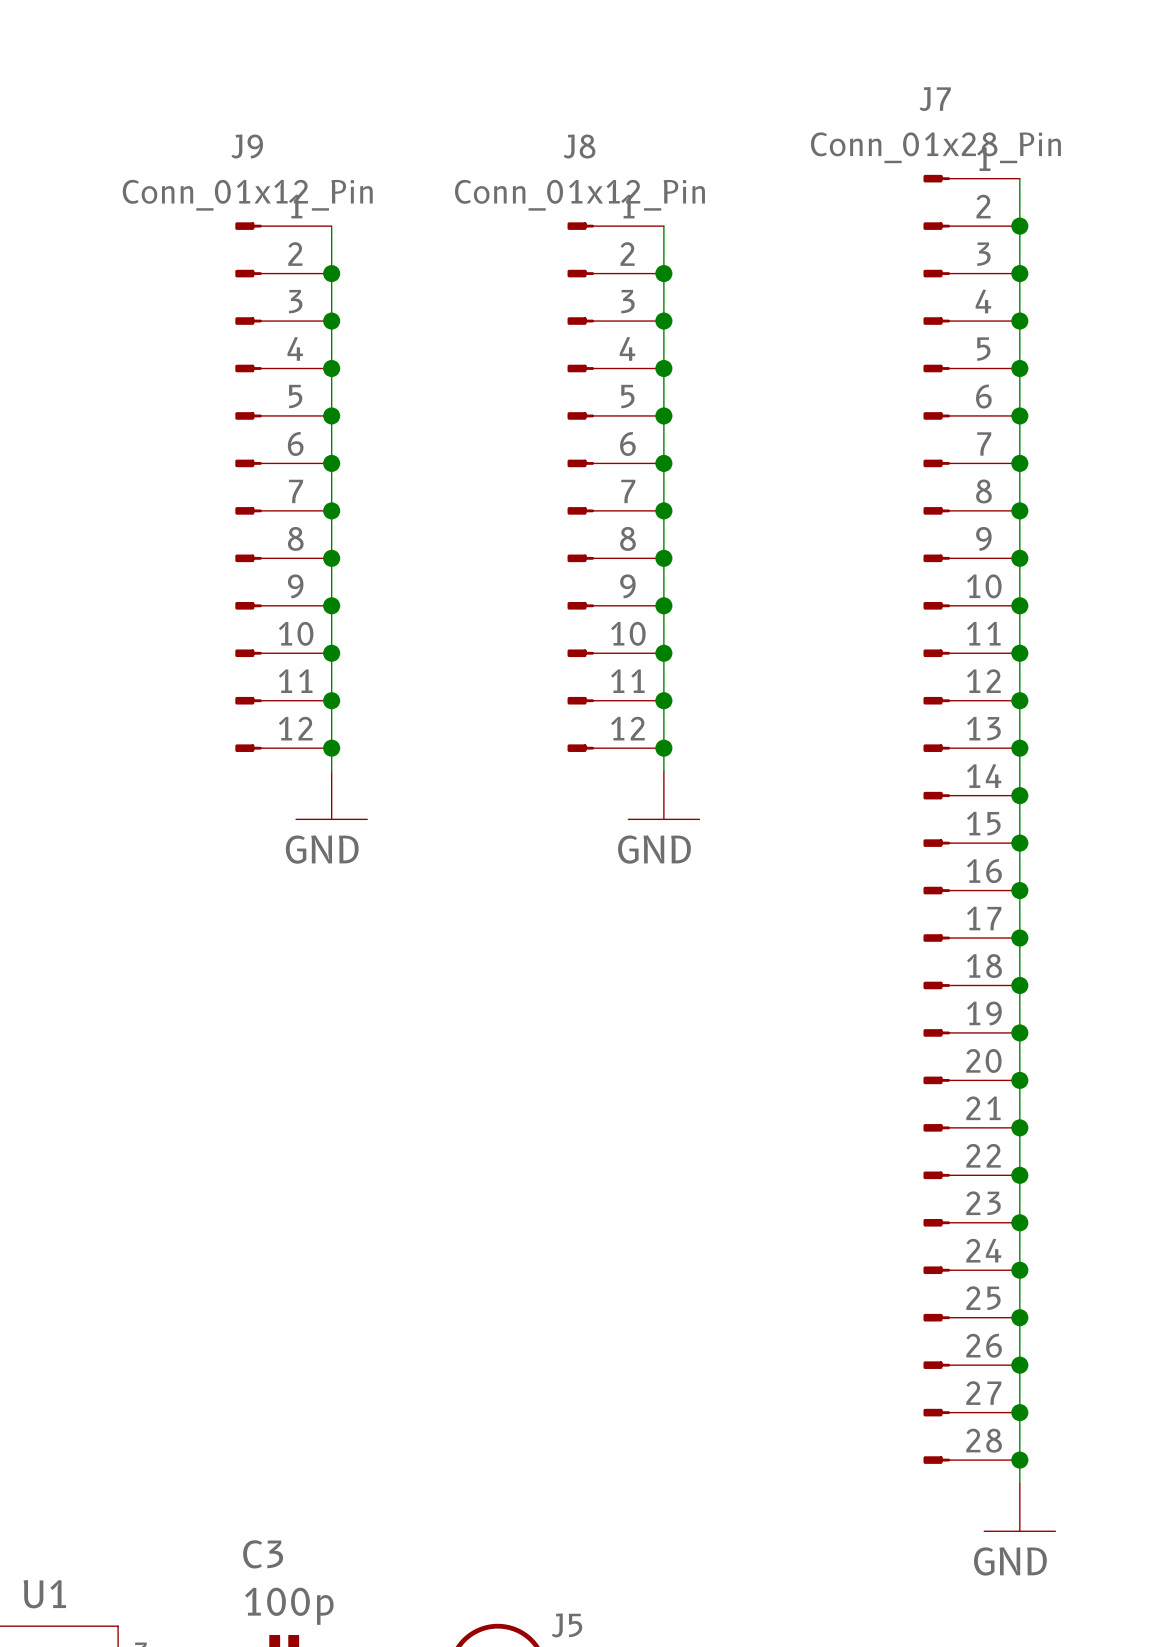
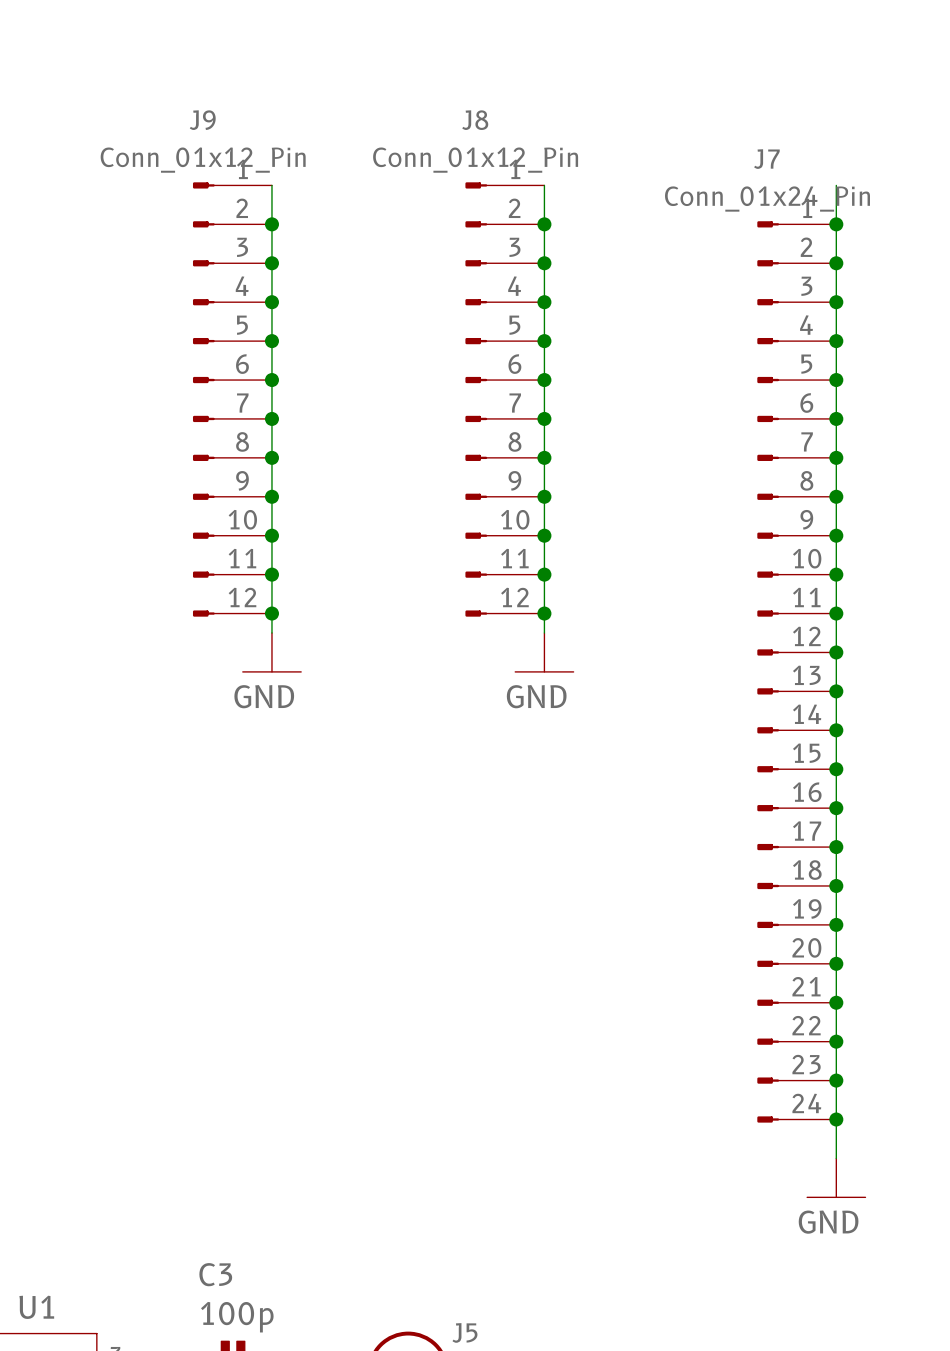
J7 name position: J7 (935, 99) -> J7 (766, 159)
J7 value: Conn_01x28_Pin (935, 147) -> Conn_01x24_Pin (767, 199)
J7 symbol: [923, 174, 1020, 1464] -> [757, 221, 837, 1123]
wire: (1019, 178) (1019, 226) -> none
junction: (1019, 226) -> none
junction: (1019, 1412) -> none
junction: (1019, 1460) -> none
power symbol position: GND (1019, 1507) -> GND (836, 1177)

